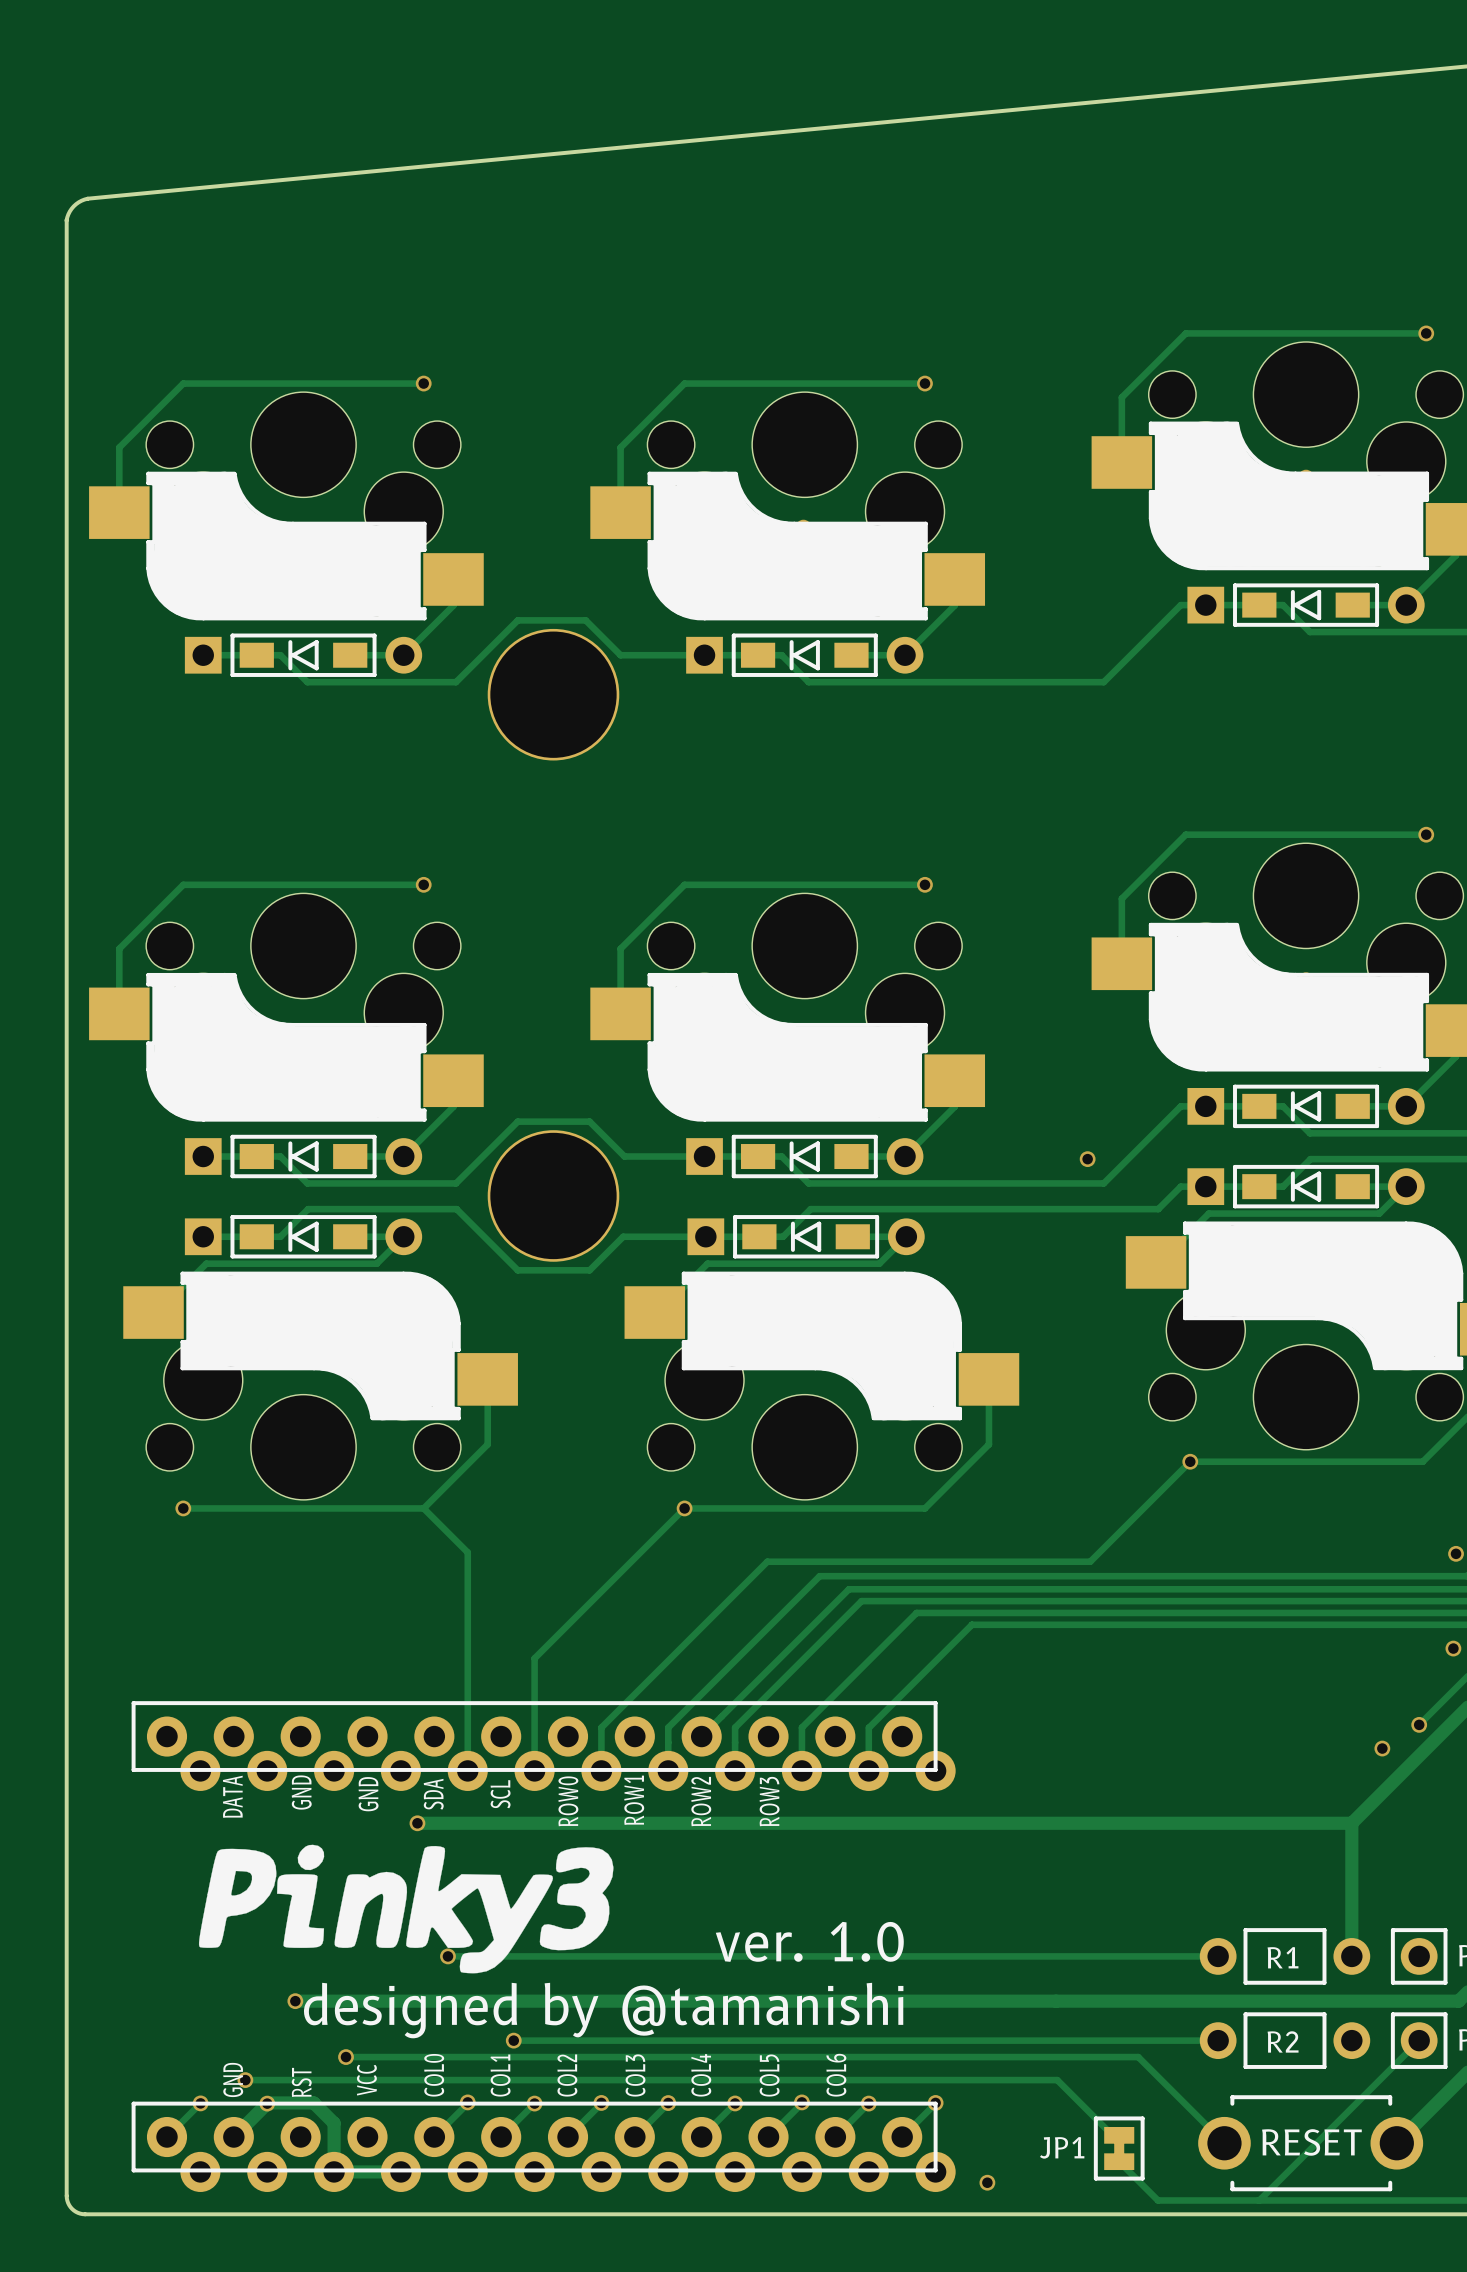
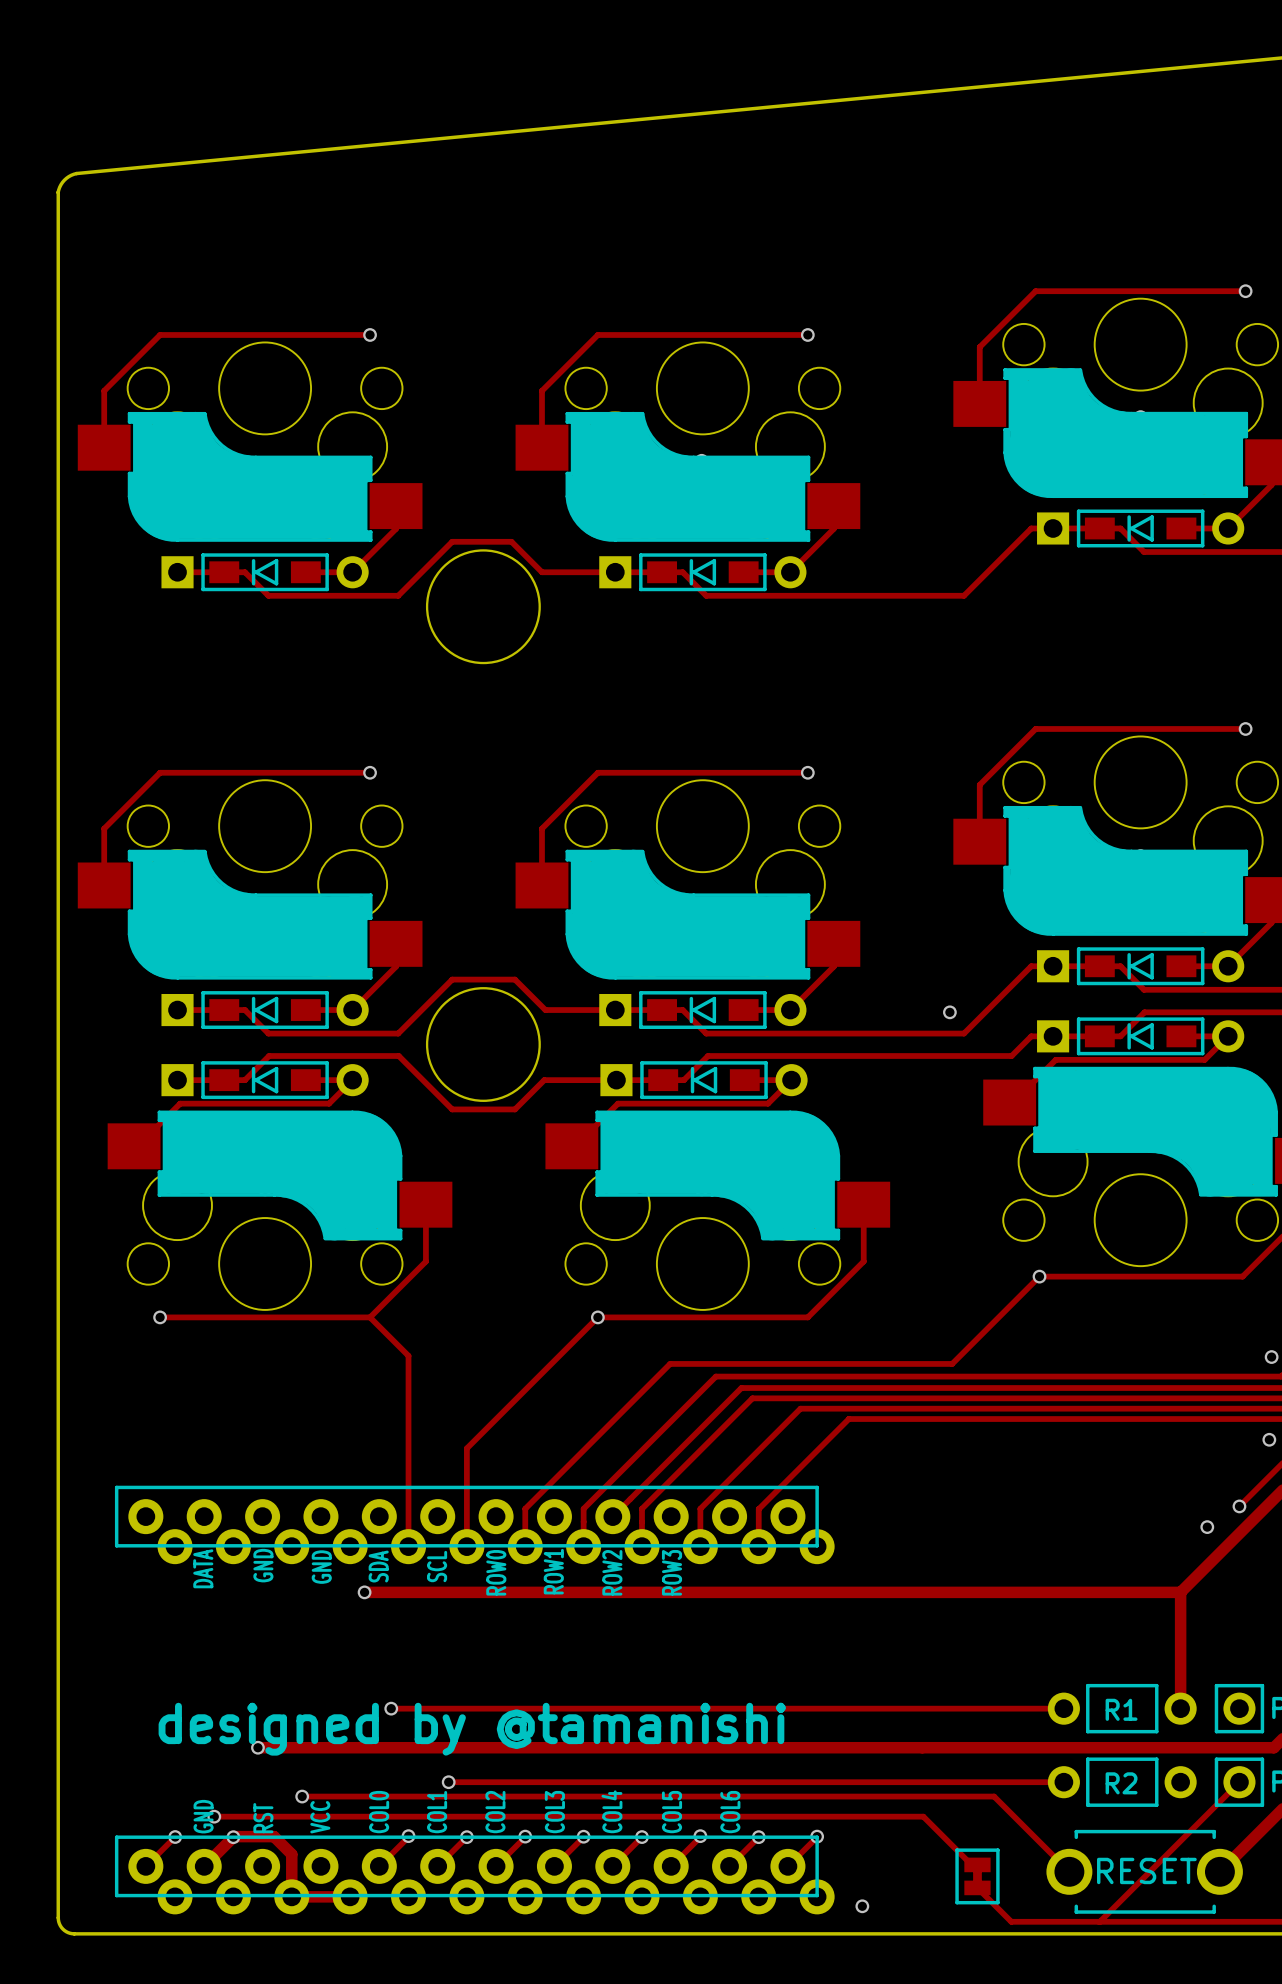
drawing: [198, 1844, 614, 1974] -> none
text: ver. 1.0 (809, 1941) -> none
text position: designed by @tamanishi (603, 2010) -> designed by @tamanishi (472, 1729)
JP1 name: JP1 (1062, 2147) -> none

